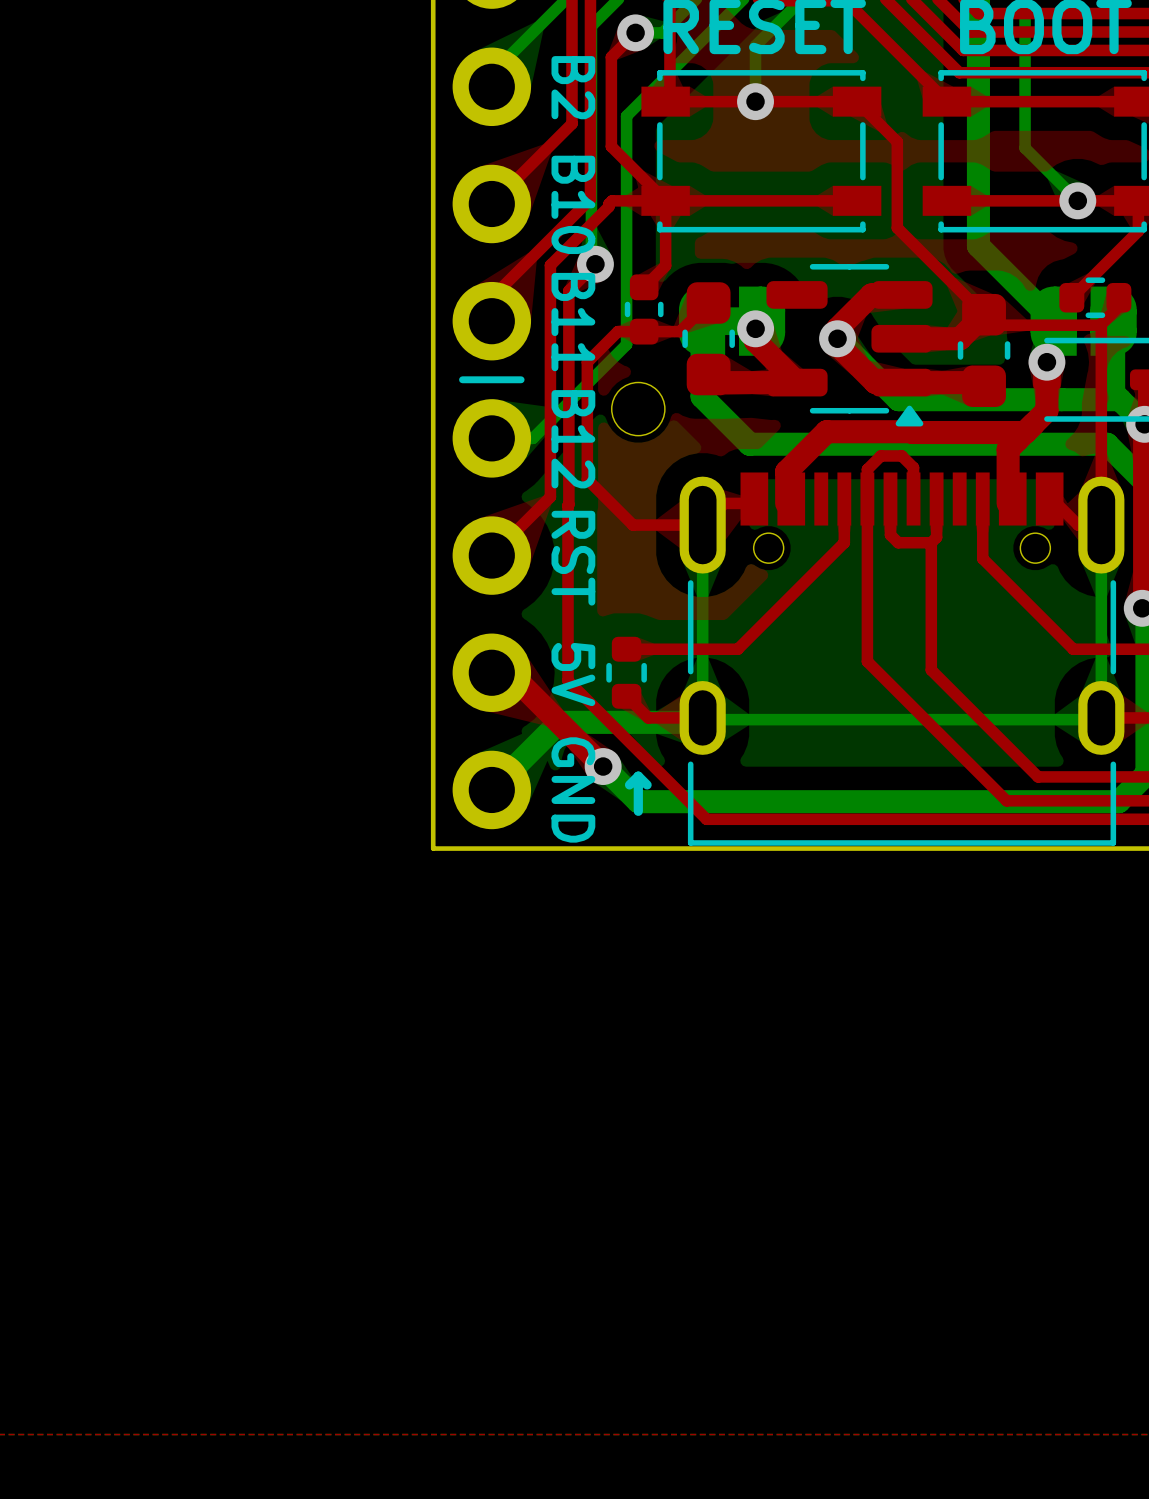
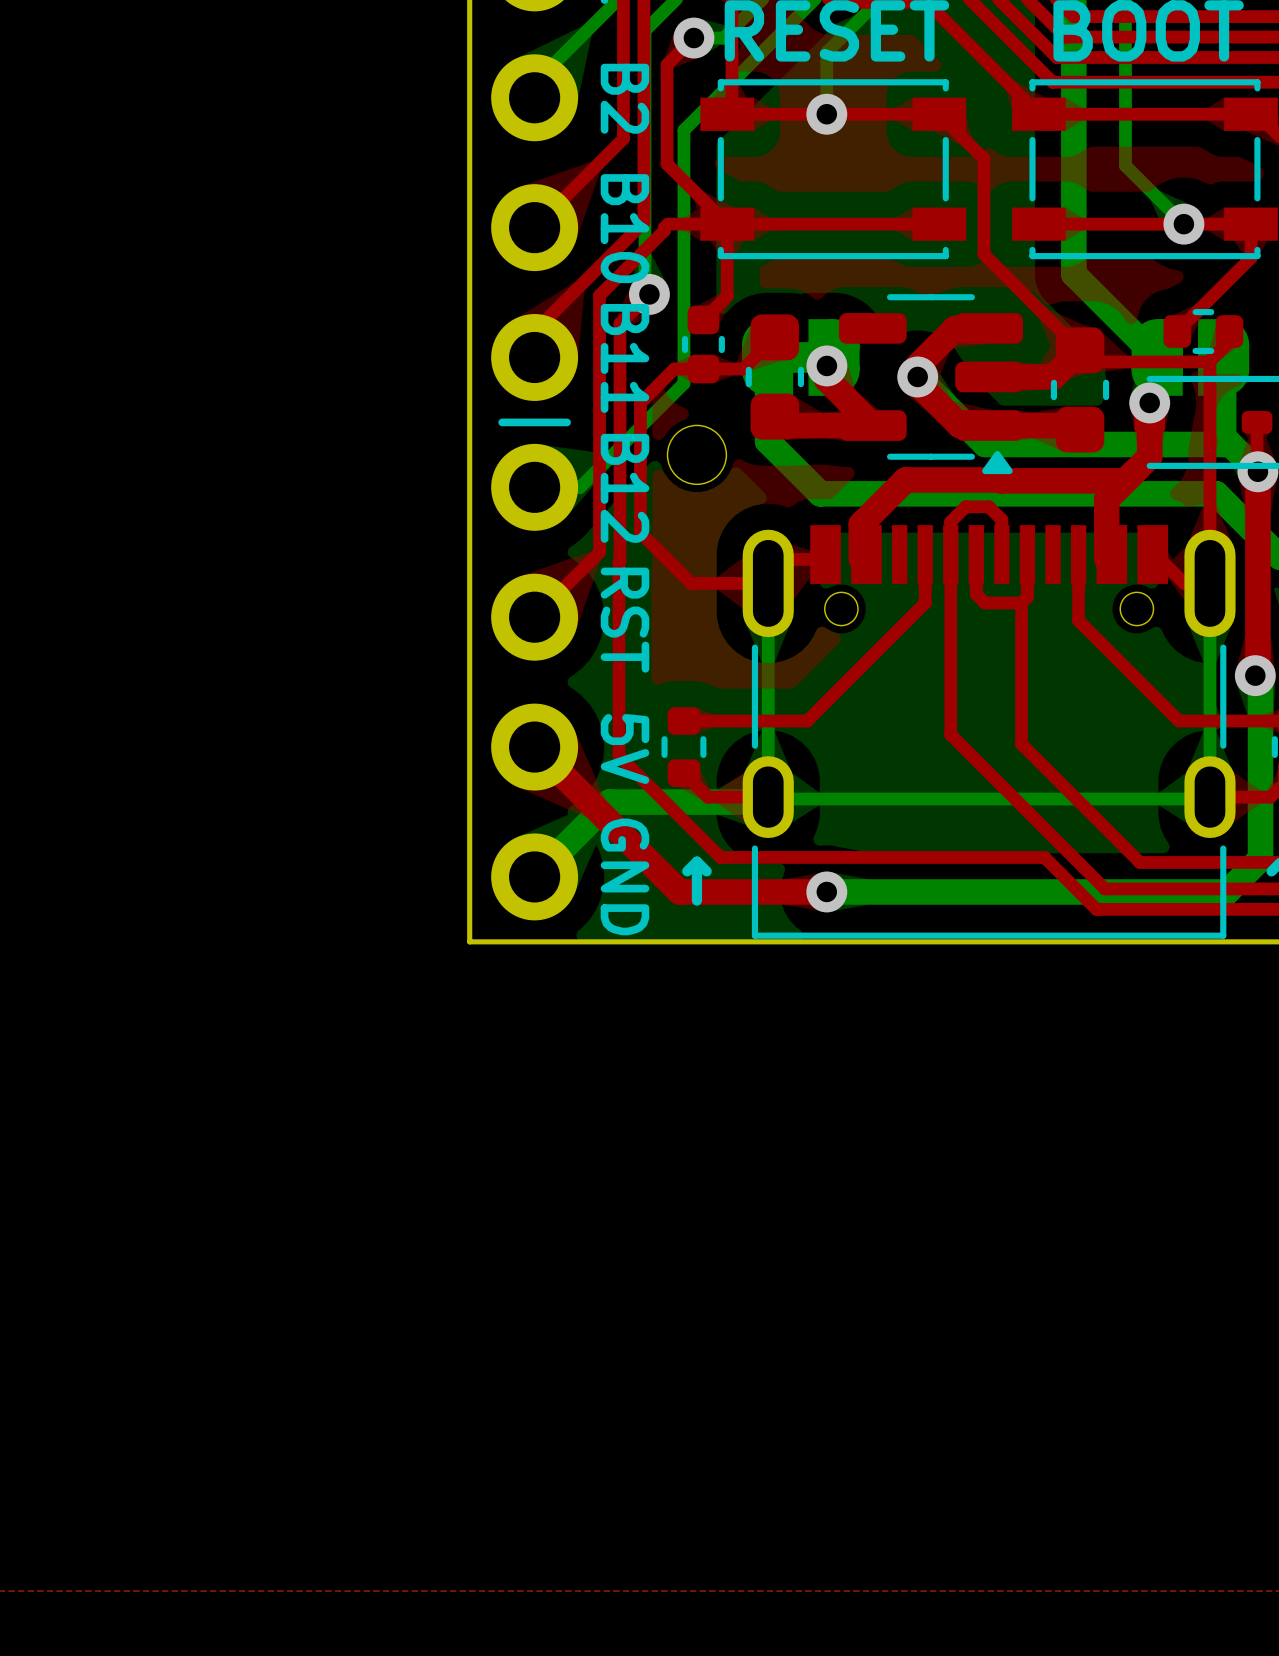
top track: (491, 672) (509, 672) (603, 766) -> (534, 747) (679, 891) (826, 891)
bottom track: (603, 766) (638, 801) (1118, 801) -> (826, 891) (1227, 891) (1229, 889)
via position: (603, 766) -> (826, 891)
top track: (659, 772) (706, 819) (998, 819) -> (720, 857) (1044, 857) (1096, 909)

